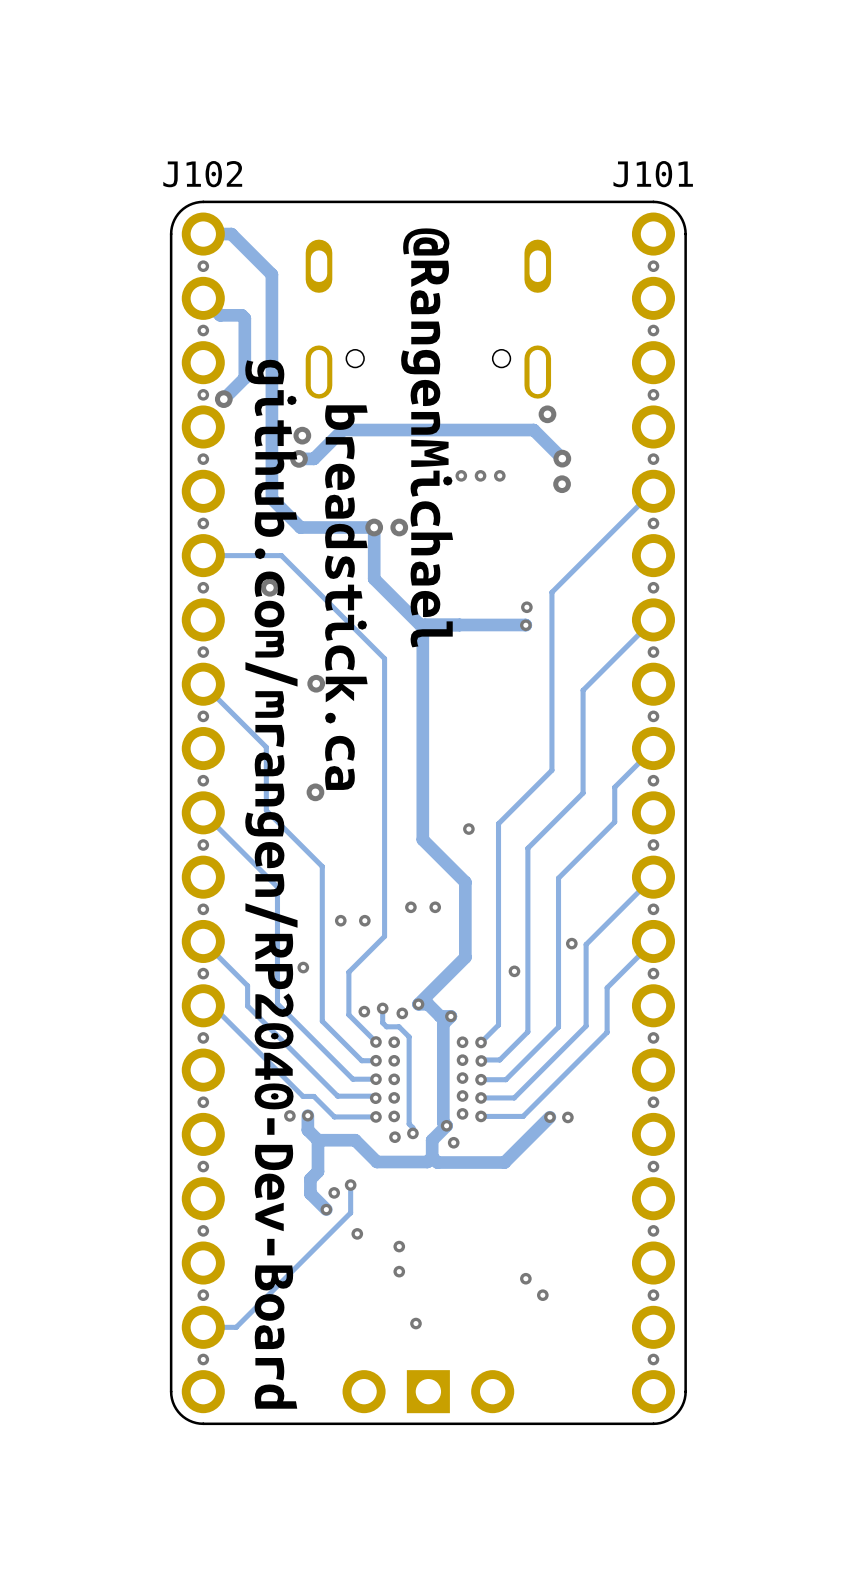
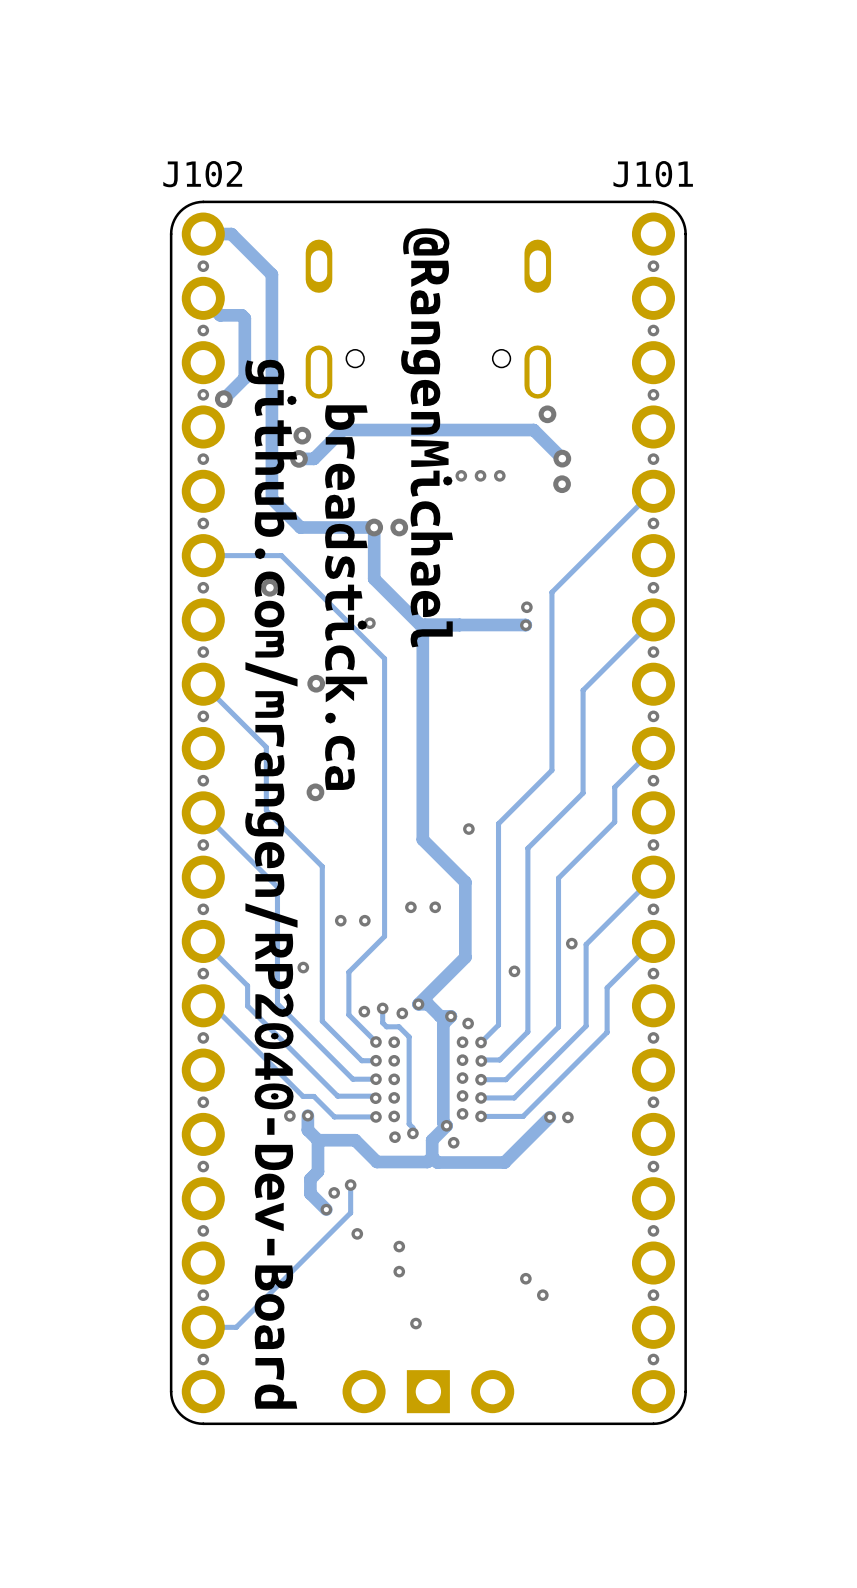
via: none -> (369, 623)
via: none -> (468, 1023)

